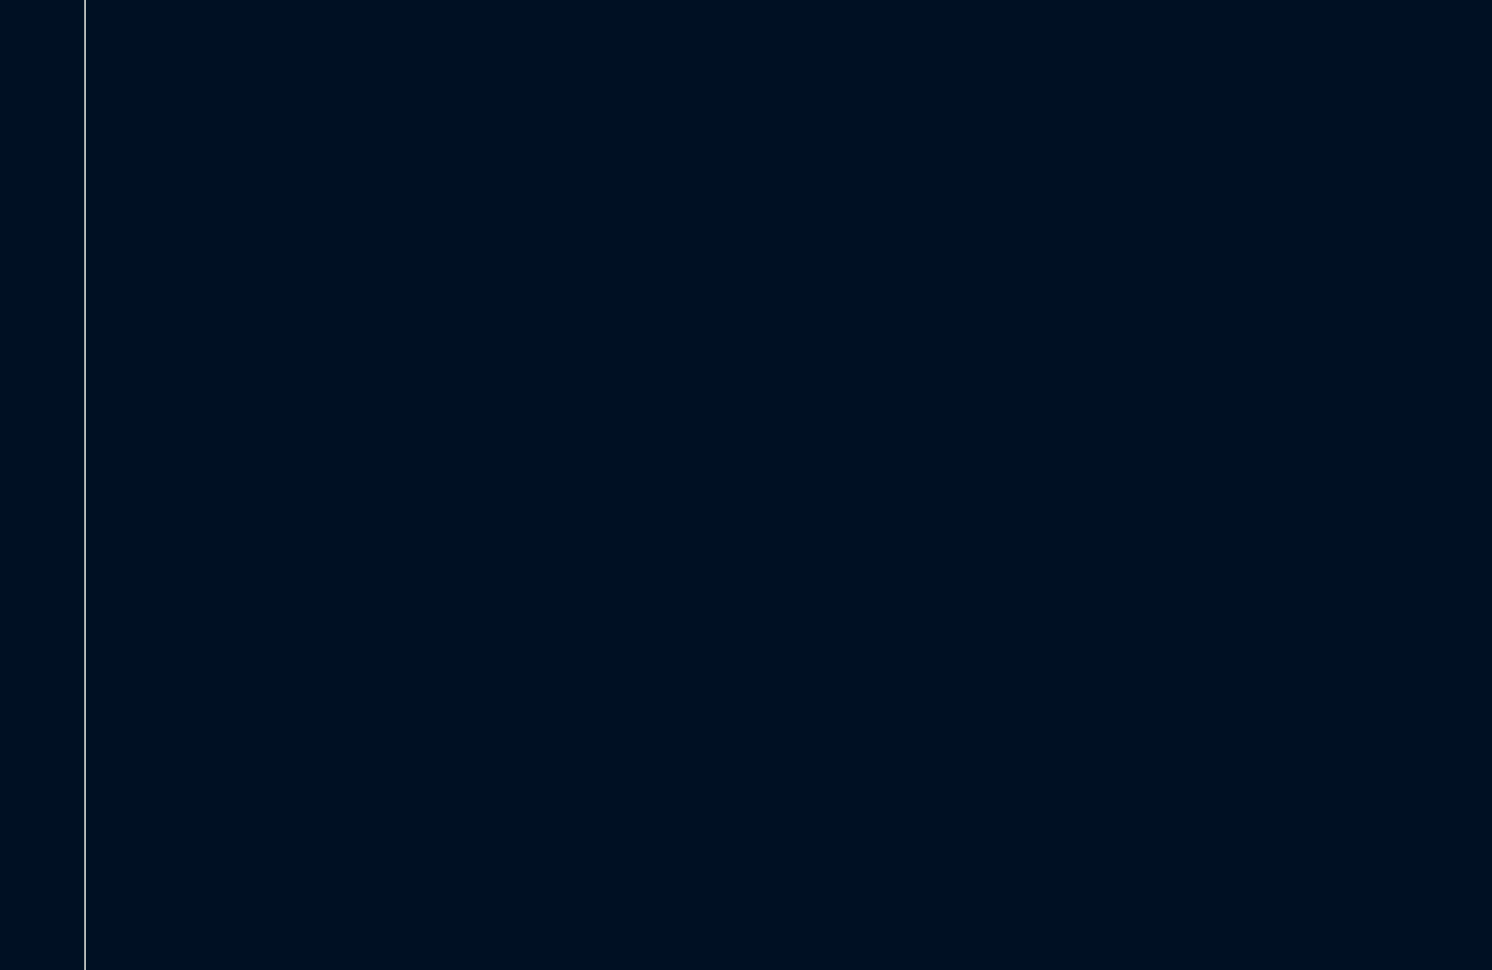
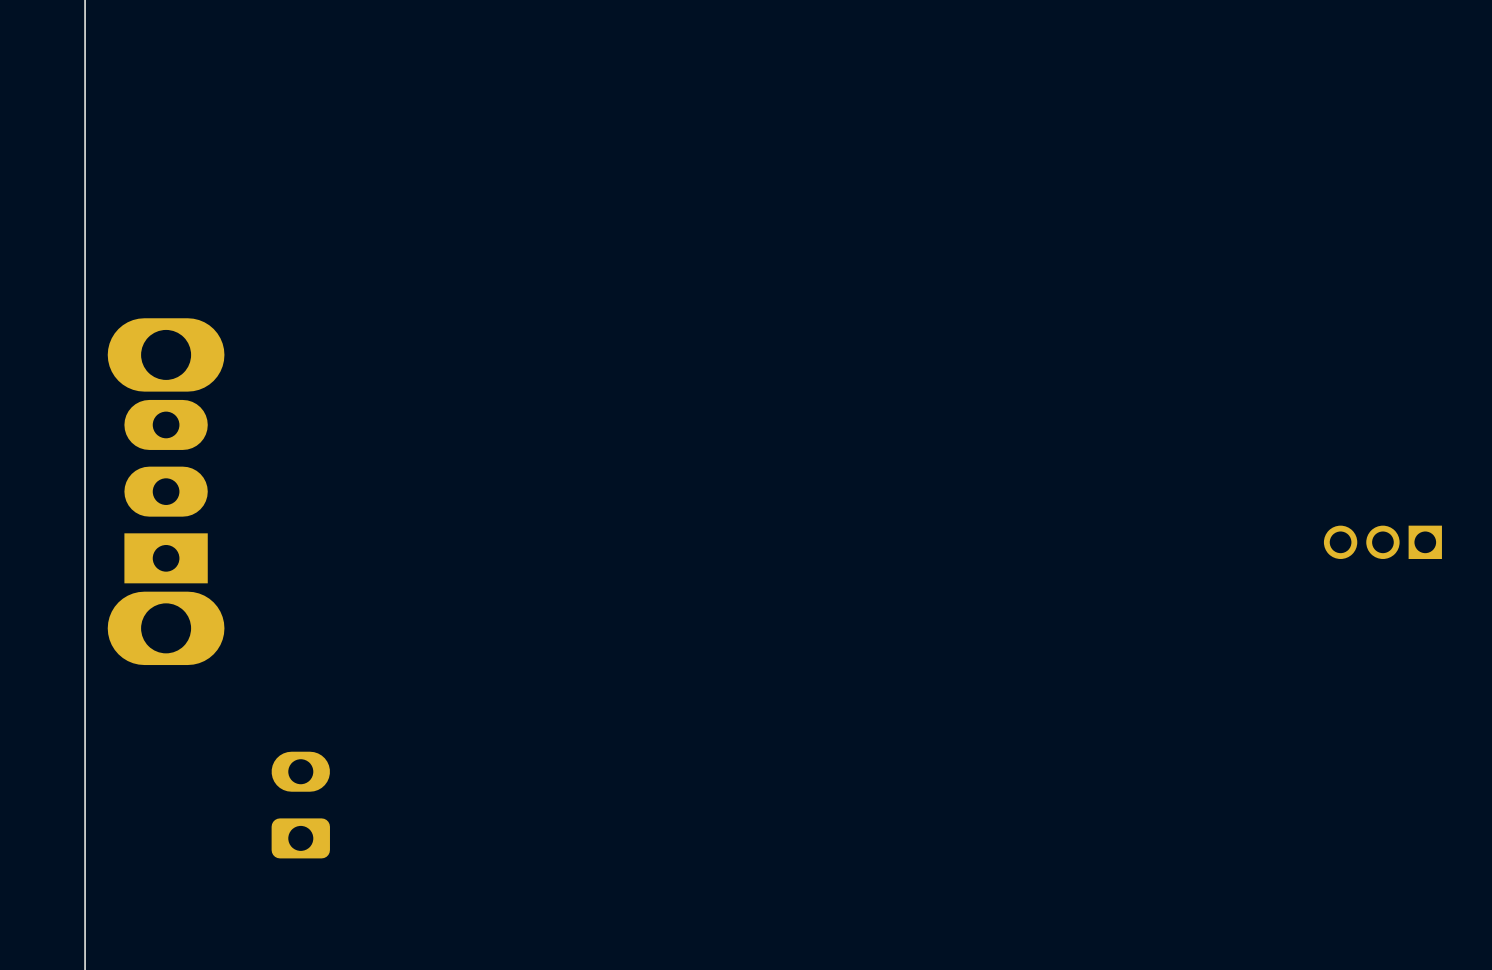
part: none -> (166, 491)
part: none -> (1382, 542)
part: none -> (300, 805)

